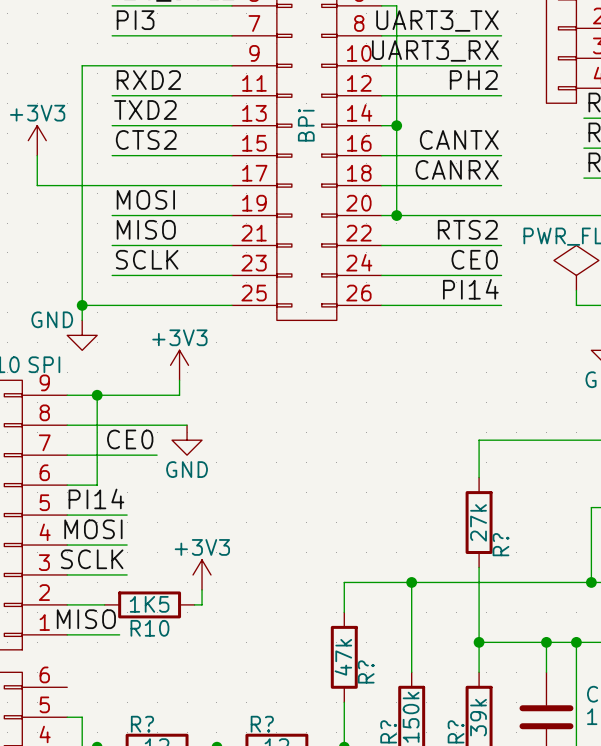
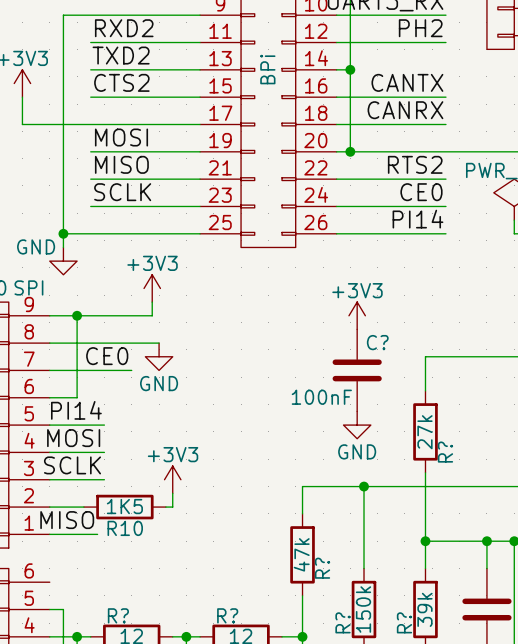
power symbol: none -> +3V3 (357, 315)
C?: none -> 100nF (357, 370)
power symbol: none -> GND (357, 425)

